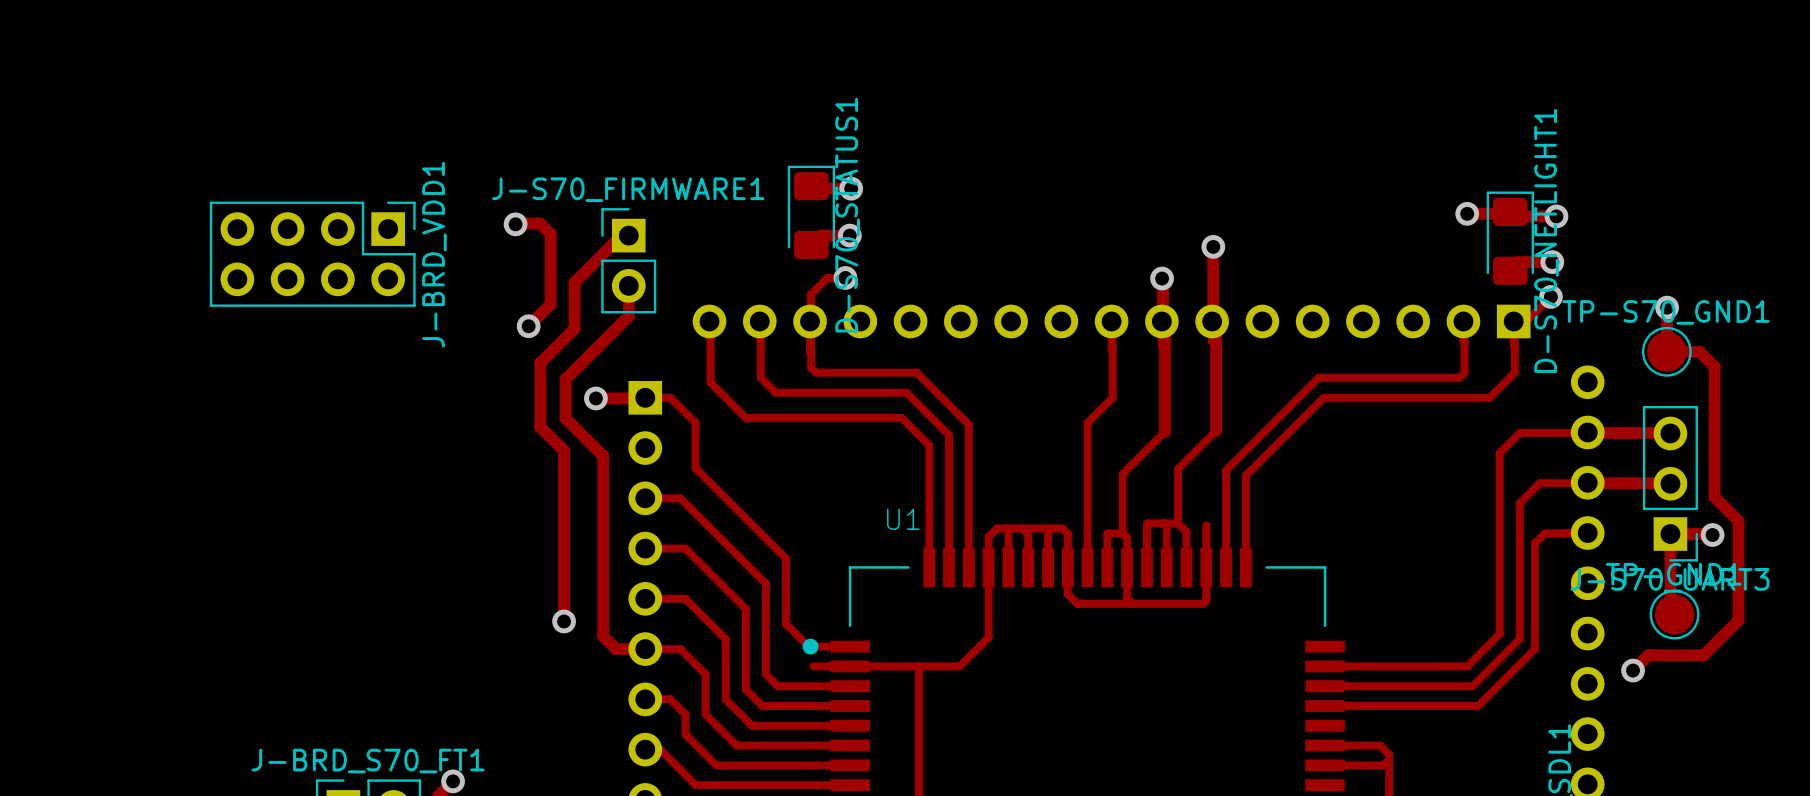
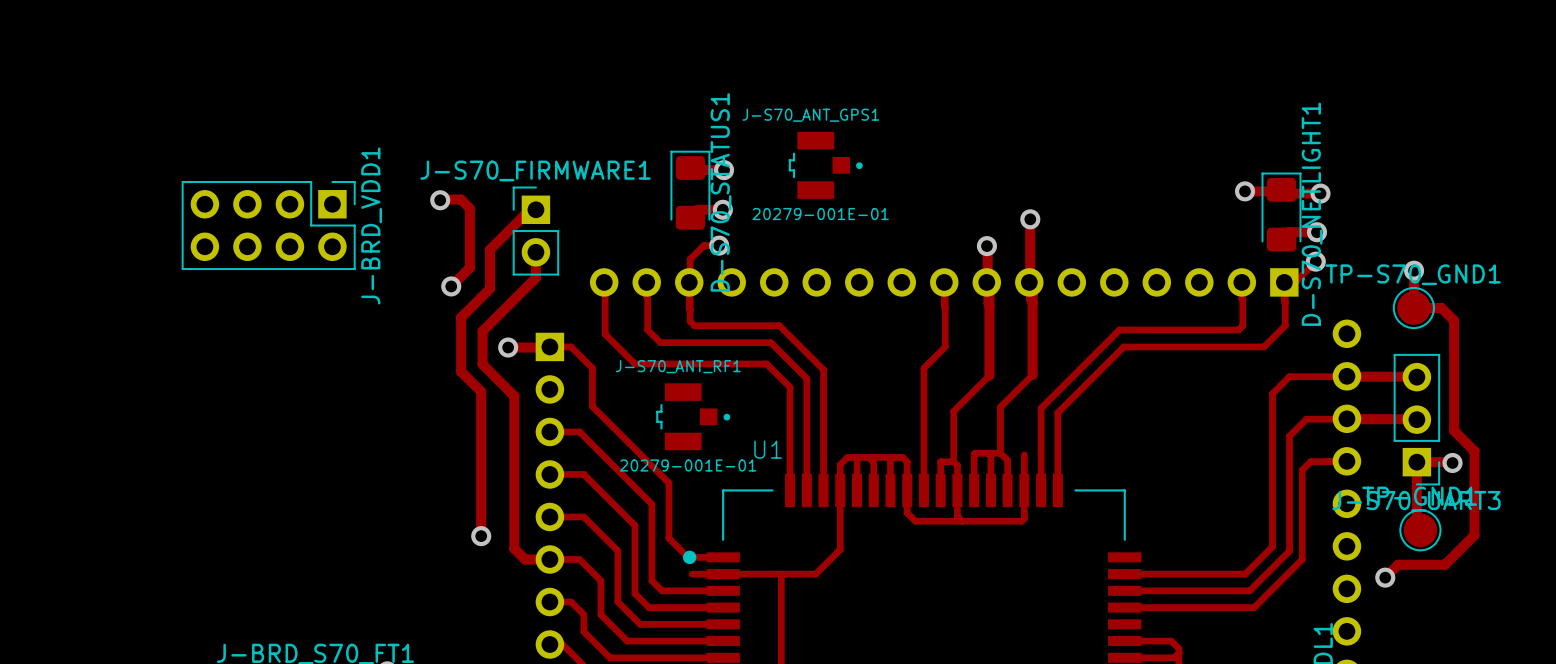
J-S70_ANT_GPS1: none -> 20279-001E-01 (825, 165)
J-S70_ANT_RF1: none -> 20279-001E-01 (693, 416)

